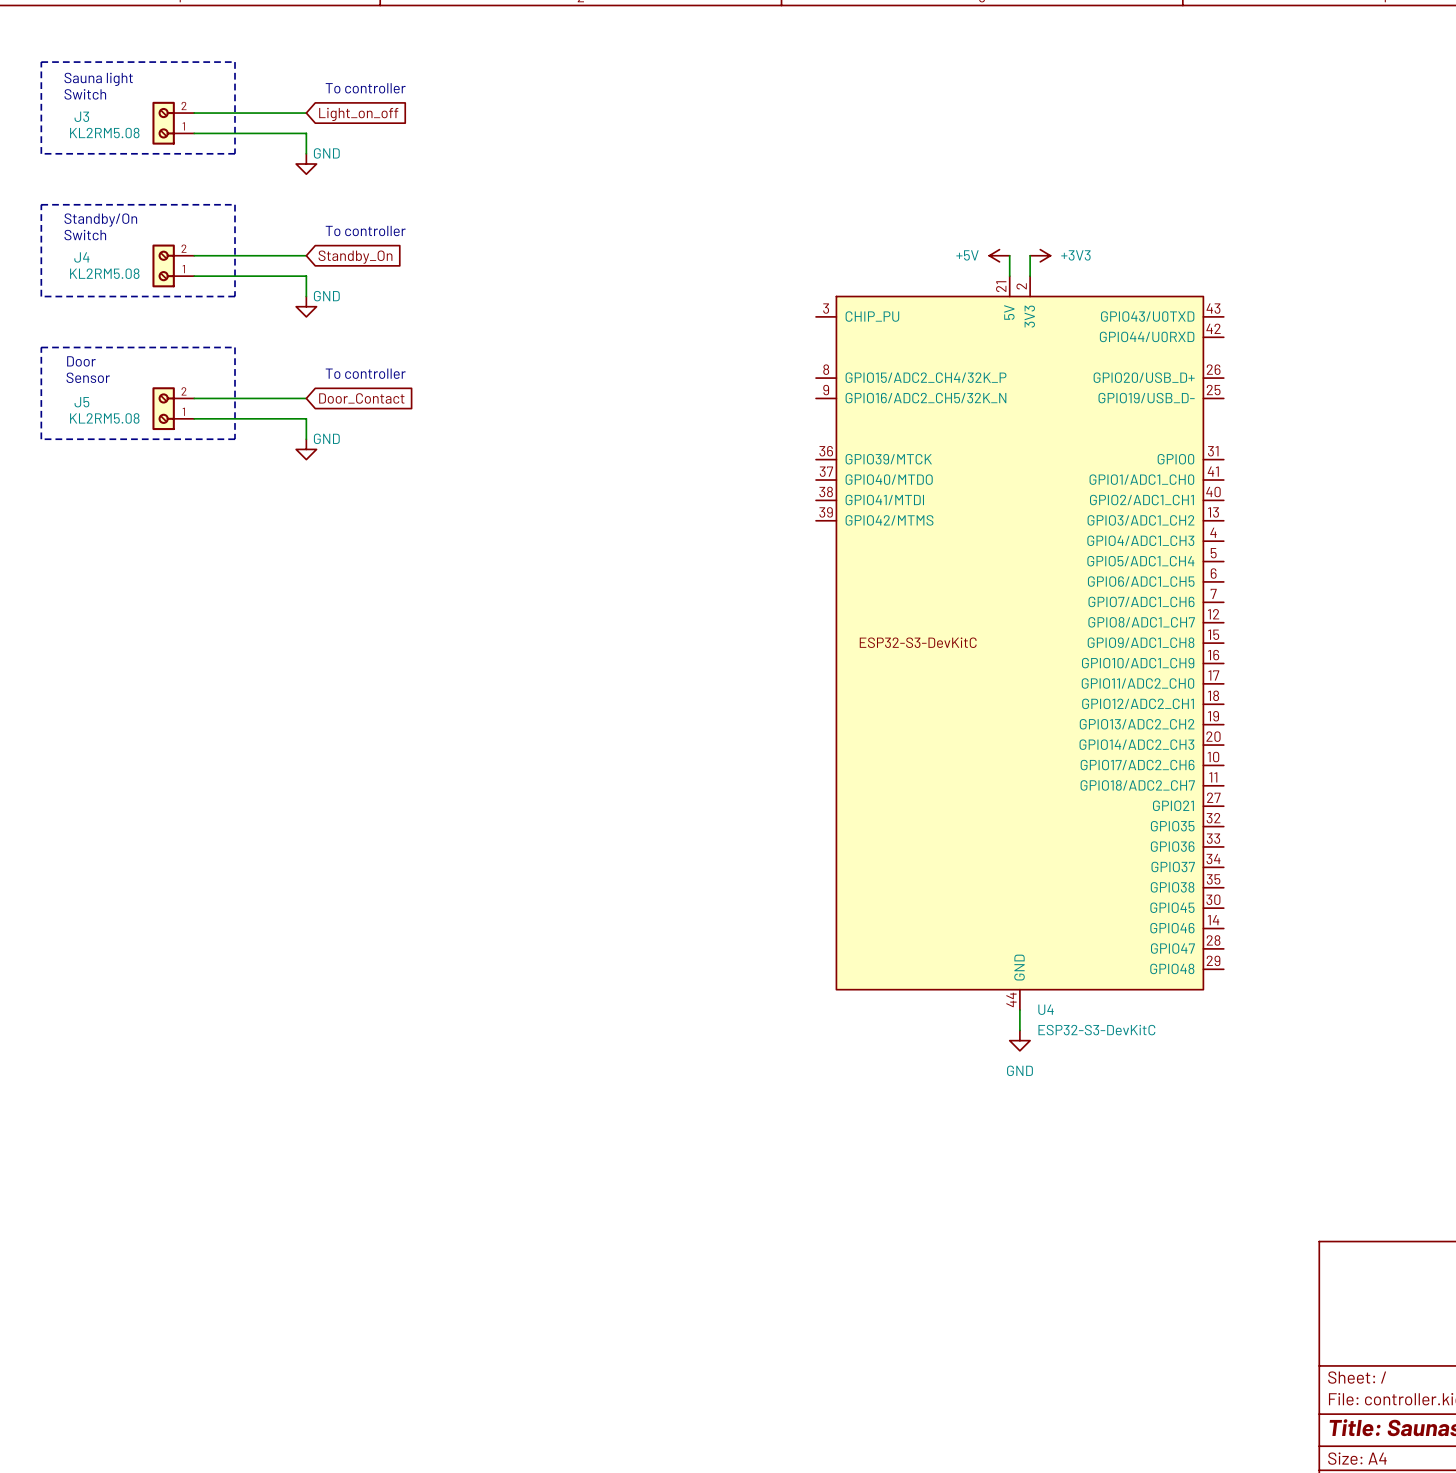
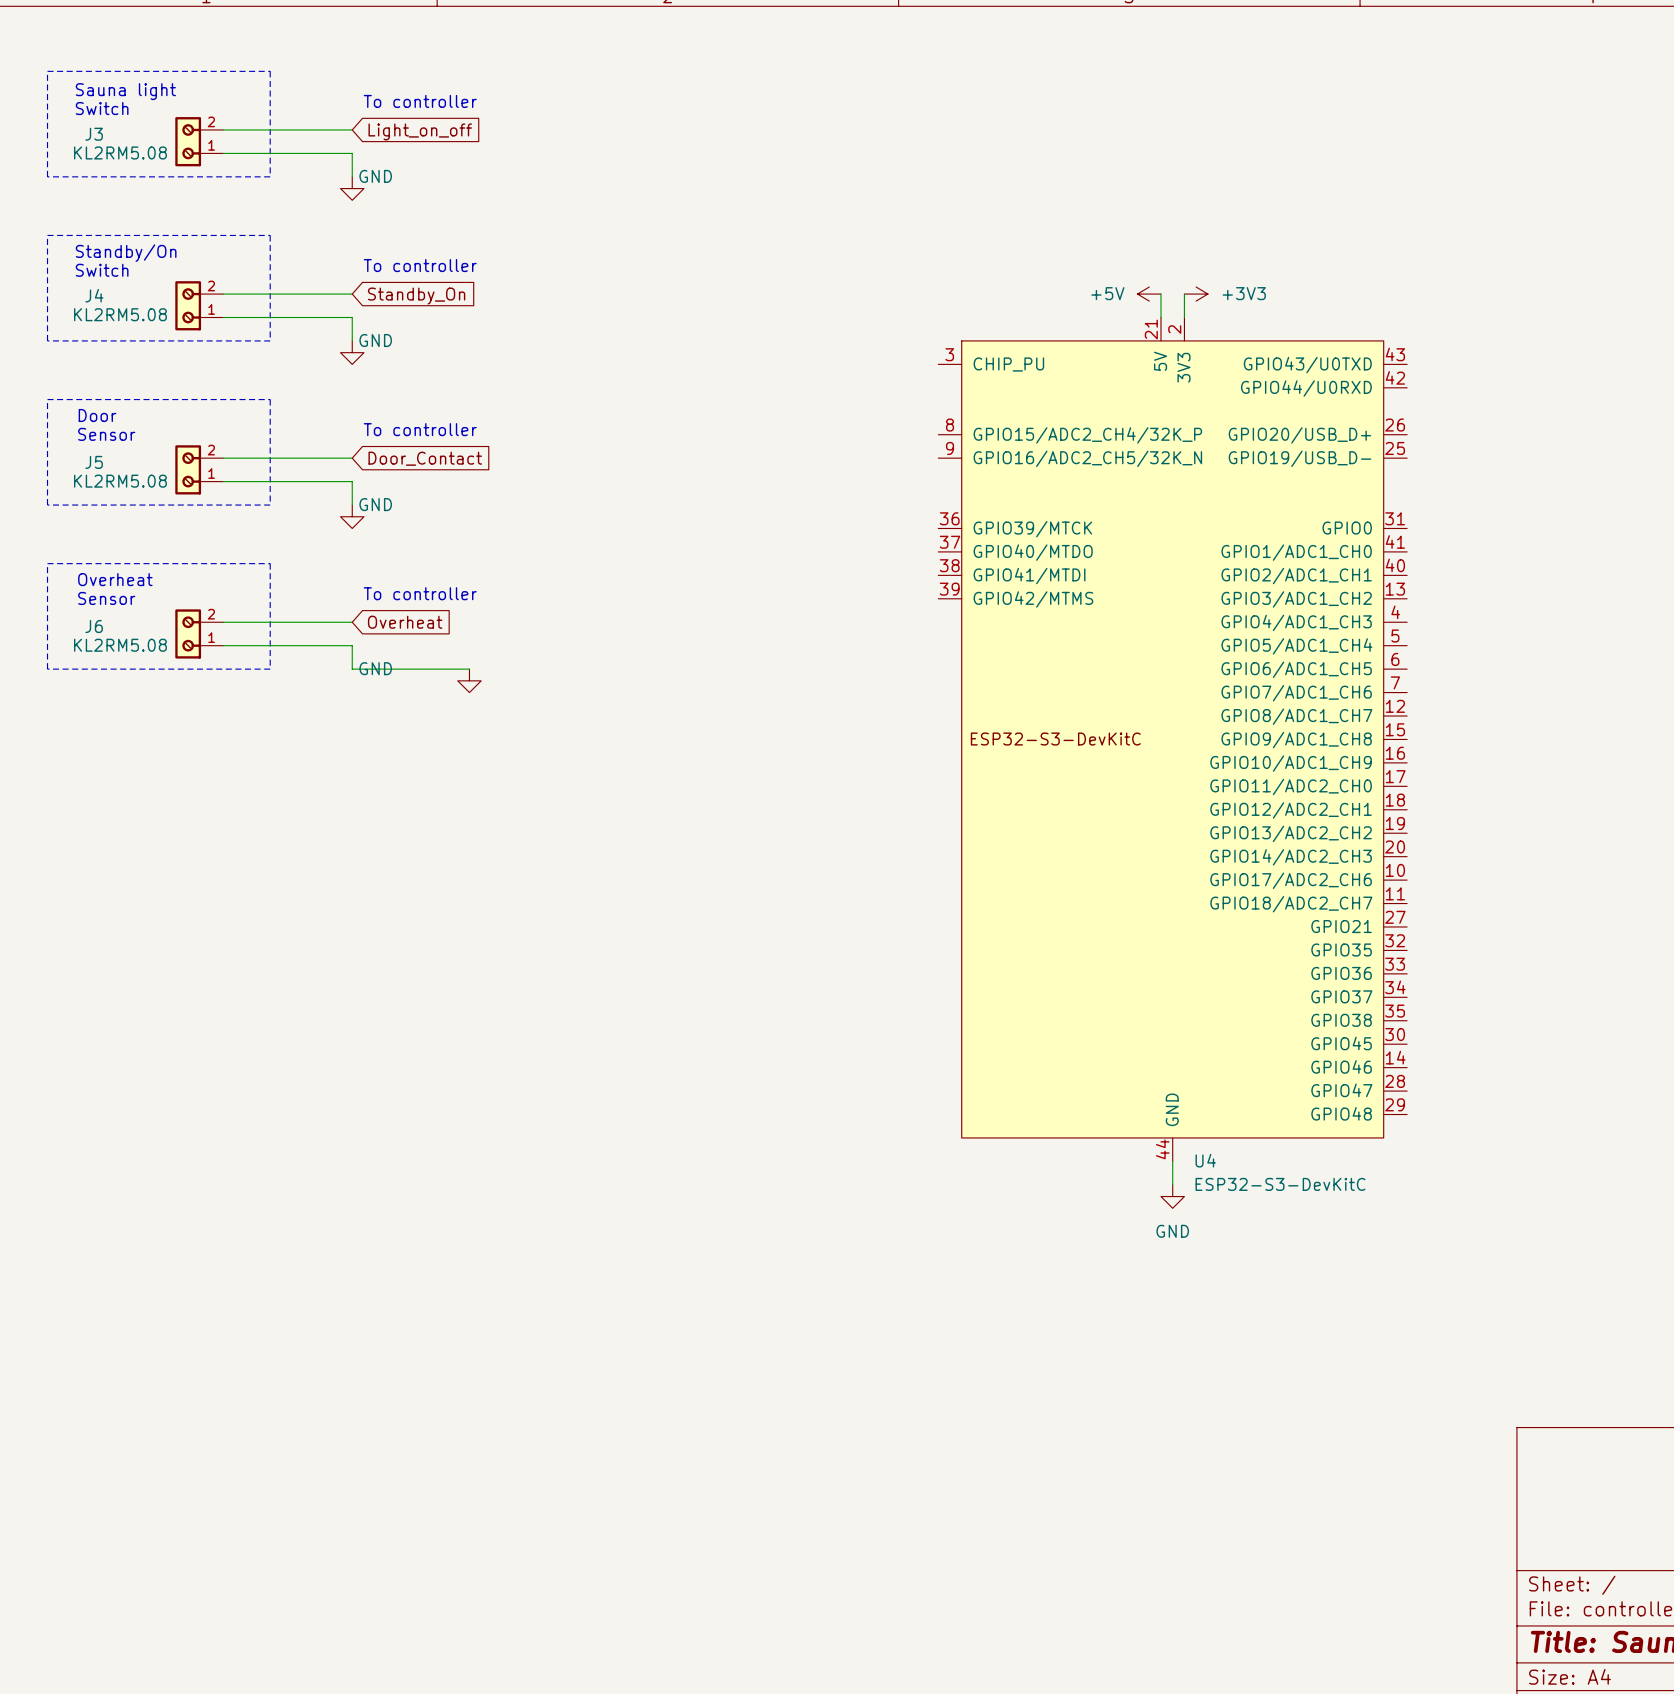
line: none -> (47, 563) (270, 563) (270, 669) (47, 669) (47, 563)
text: none -> Overheat (115, 579)
text: none -> To controller (420, 593)
text: none -> Sensor (106, 598)
wire: none -> (223, 622) (352, 622)
global label: none -> Overheat (405, 622)
J6: none -> KL2RM5.08 (199, 633)
wire: none -> (223, 645) (352, 645) (352, 669) (469, 669)
power symbol: none -> GND (469, 680)

